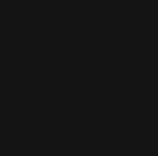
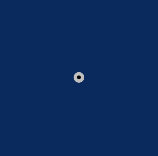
via: none -> (78, 77)

